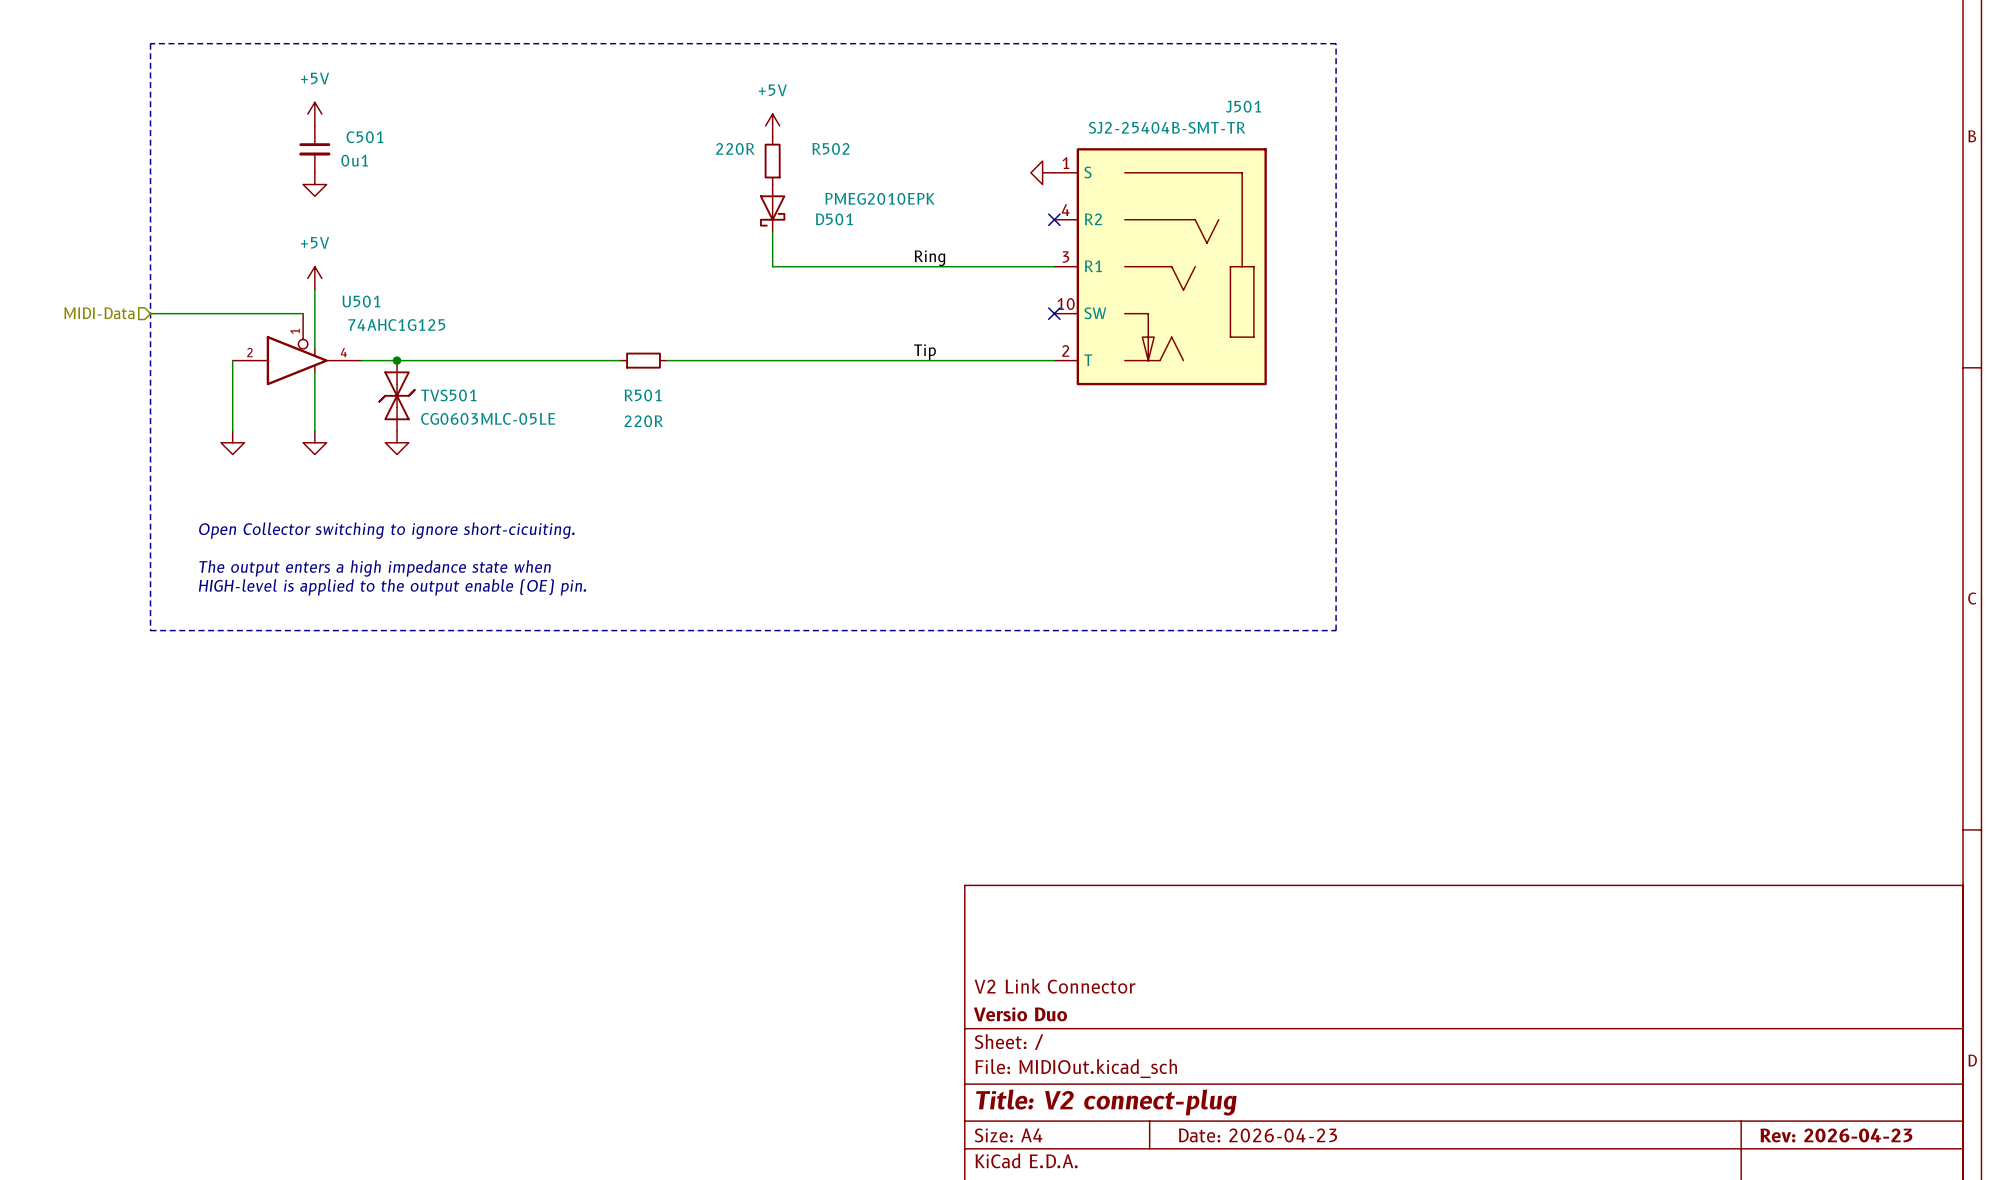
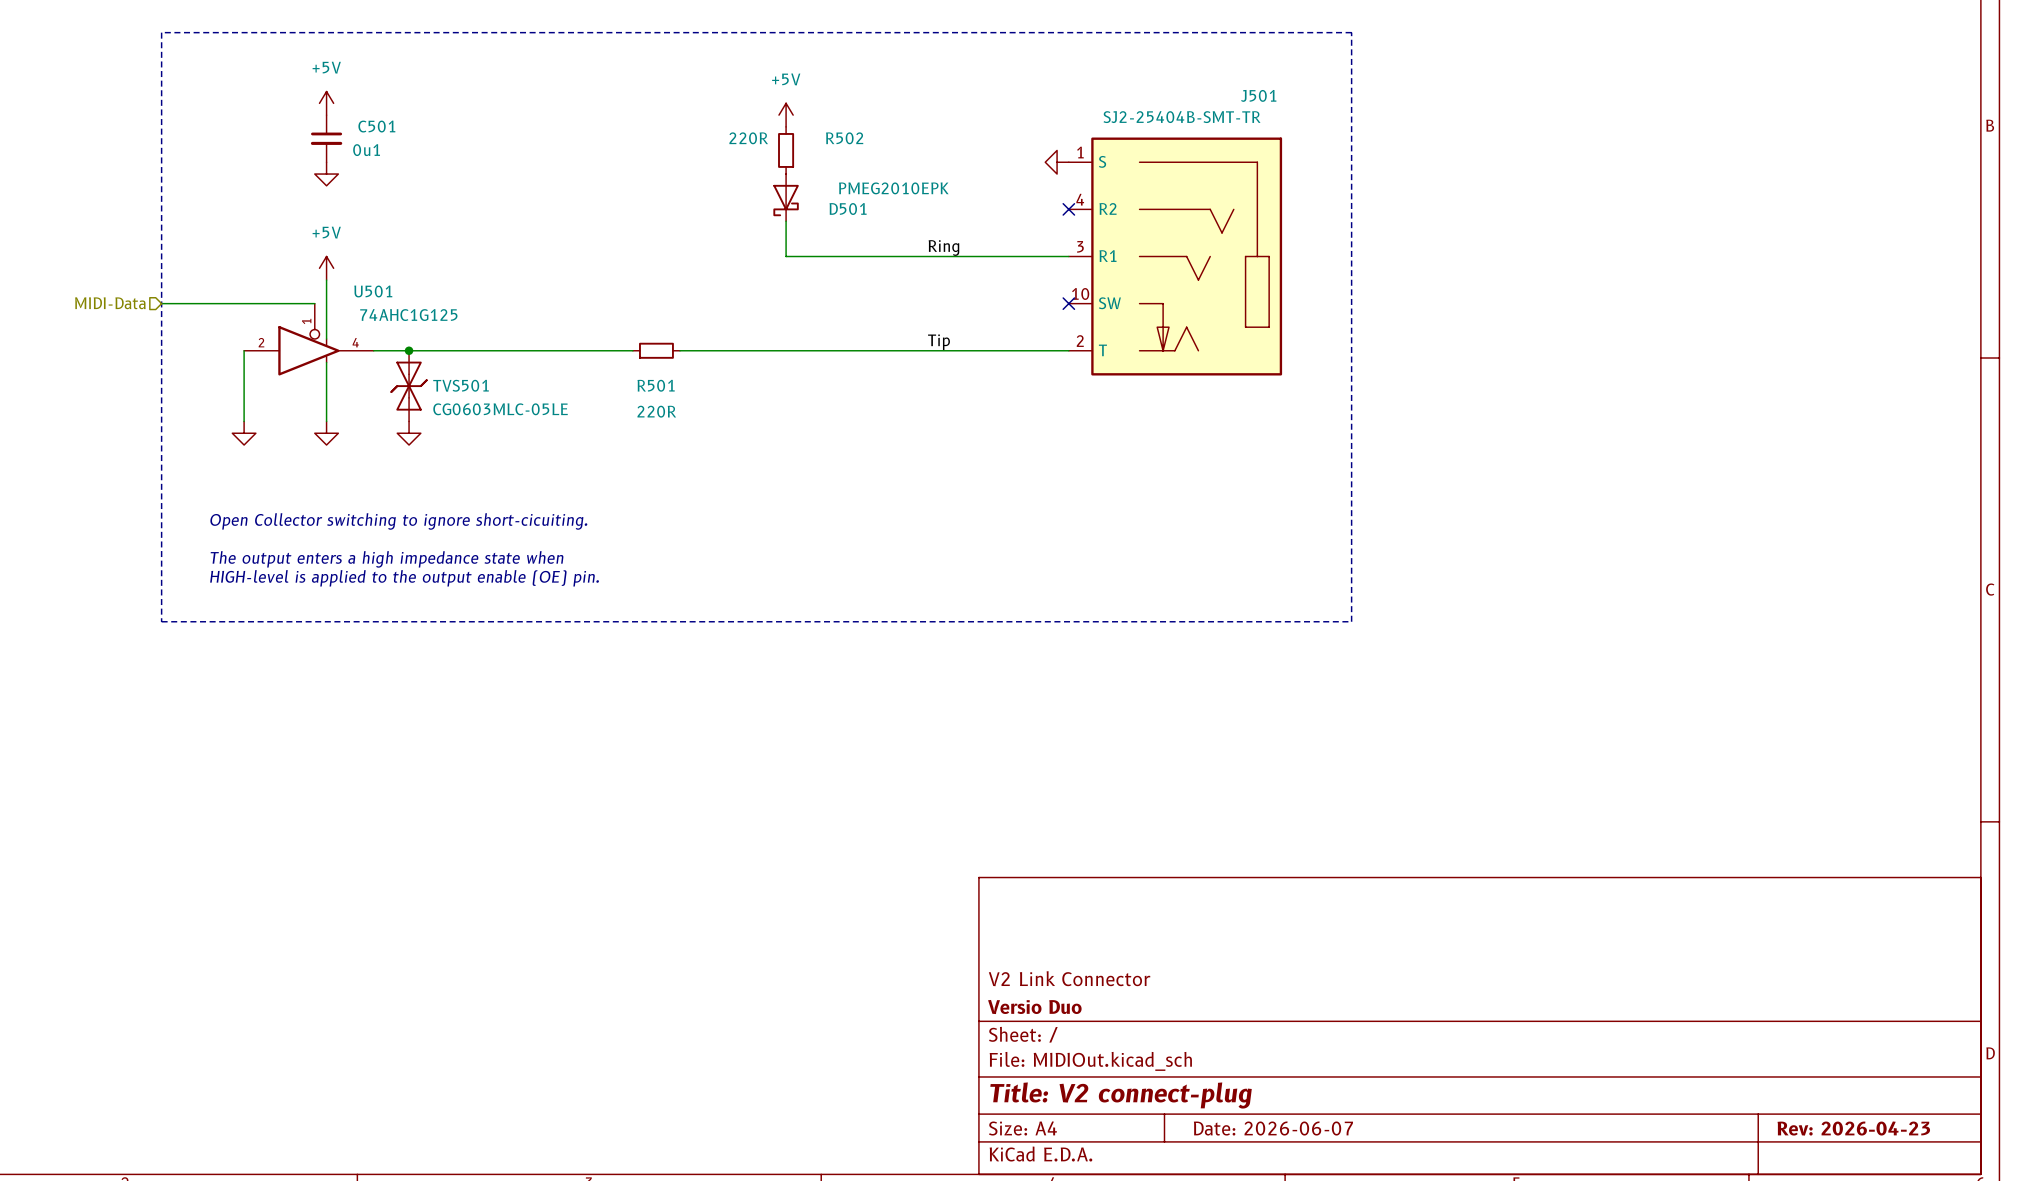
title block: Date: 2026-04-23 (1257, 1135) -> Date: 2026-06-07 (1273, 1128)

